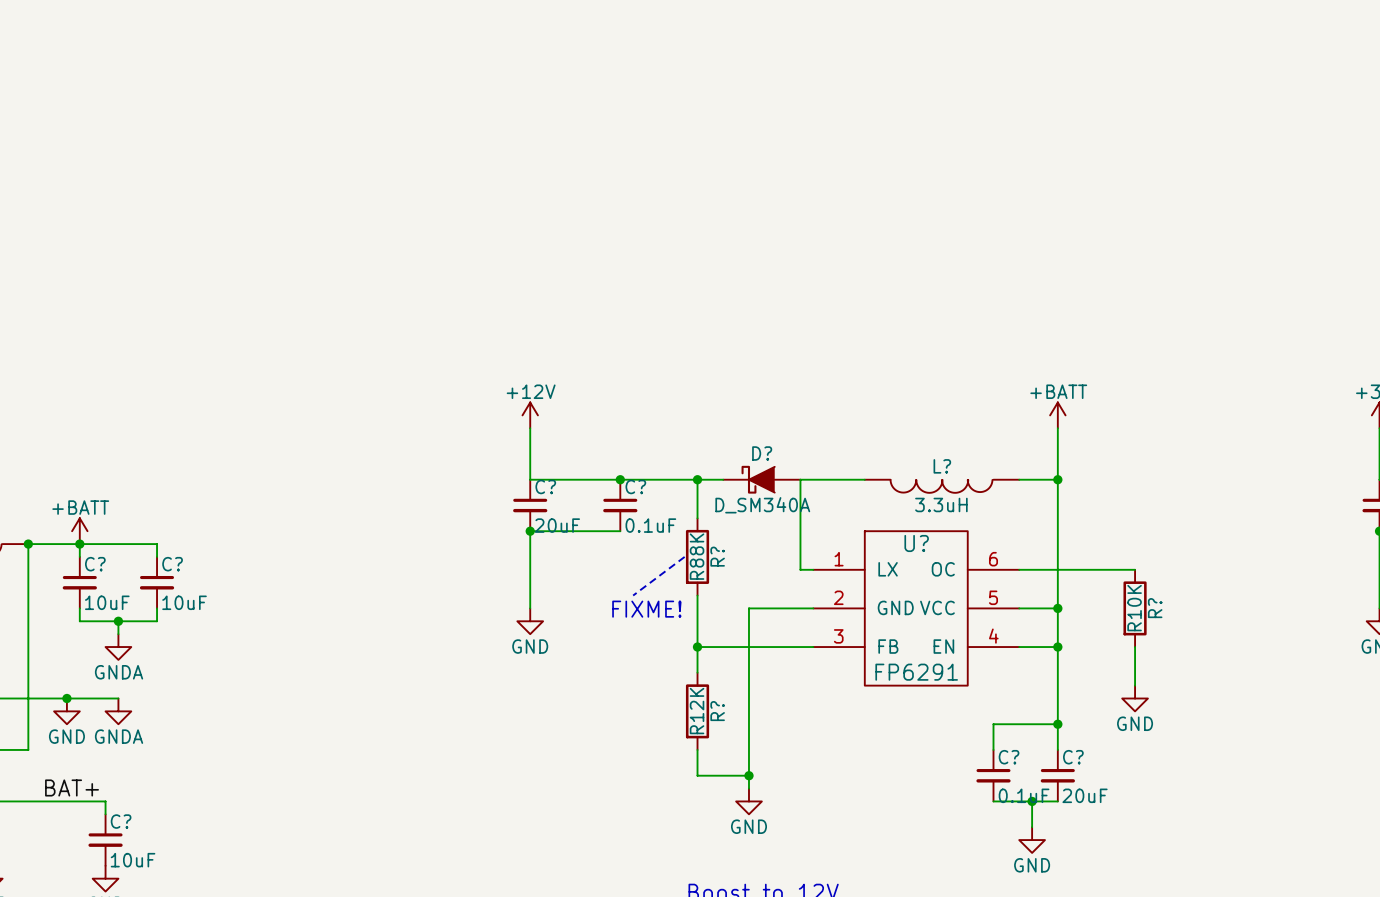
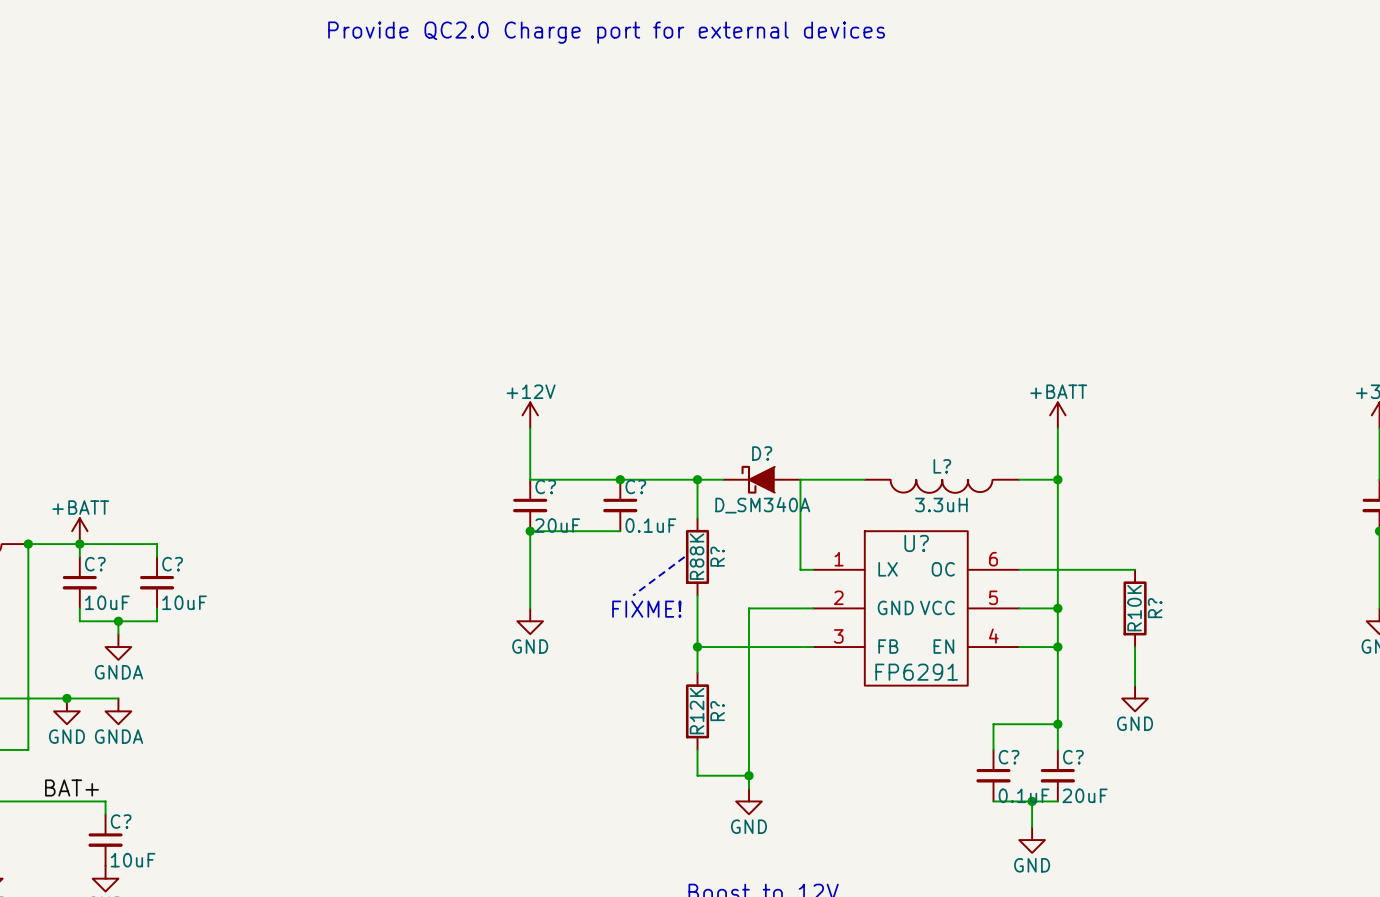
text: none -> Provide QC2.0 Charge port for external devices (606, 32)

